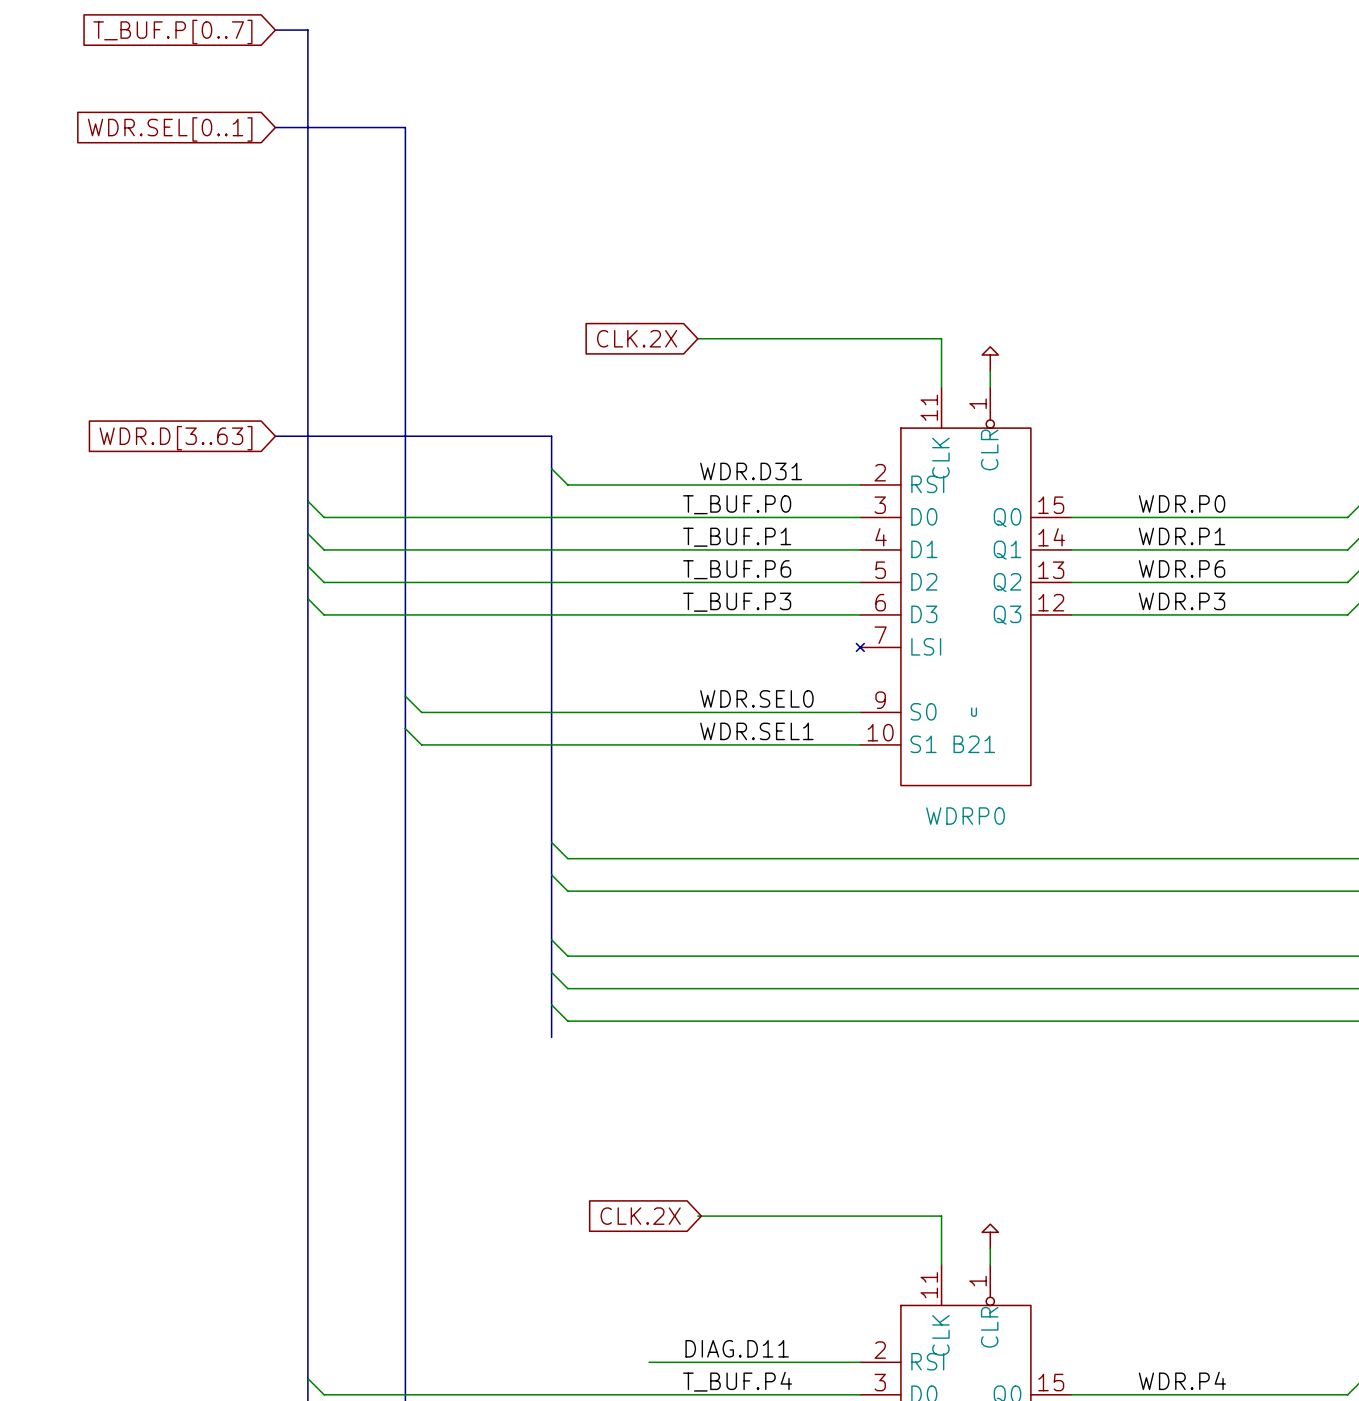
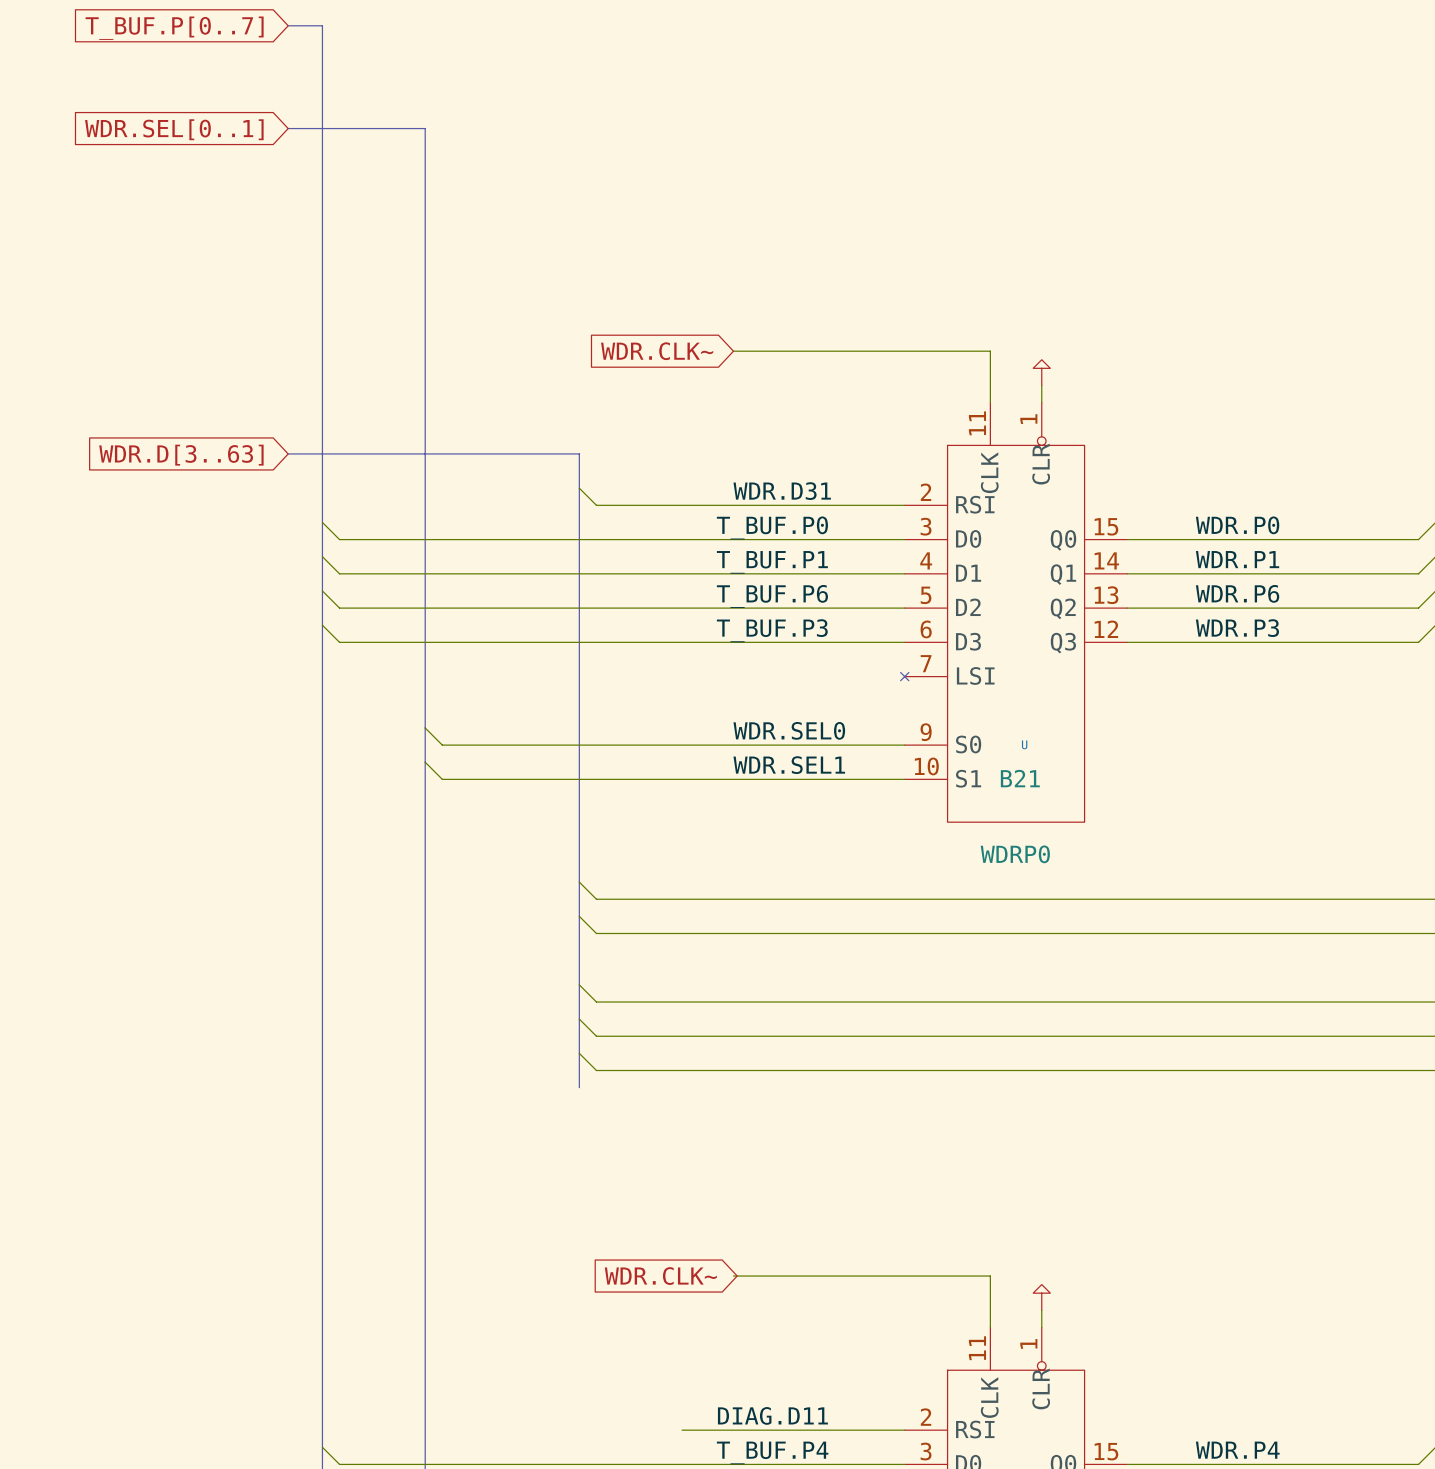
global label: CLK.2X (637, 338) -> WDR.CLK~ (657, 351)
global label: CLK.2X (640, 1216) -> WDR.CLK~ (660, 1276)

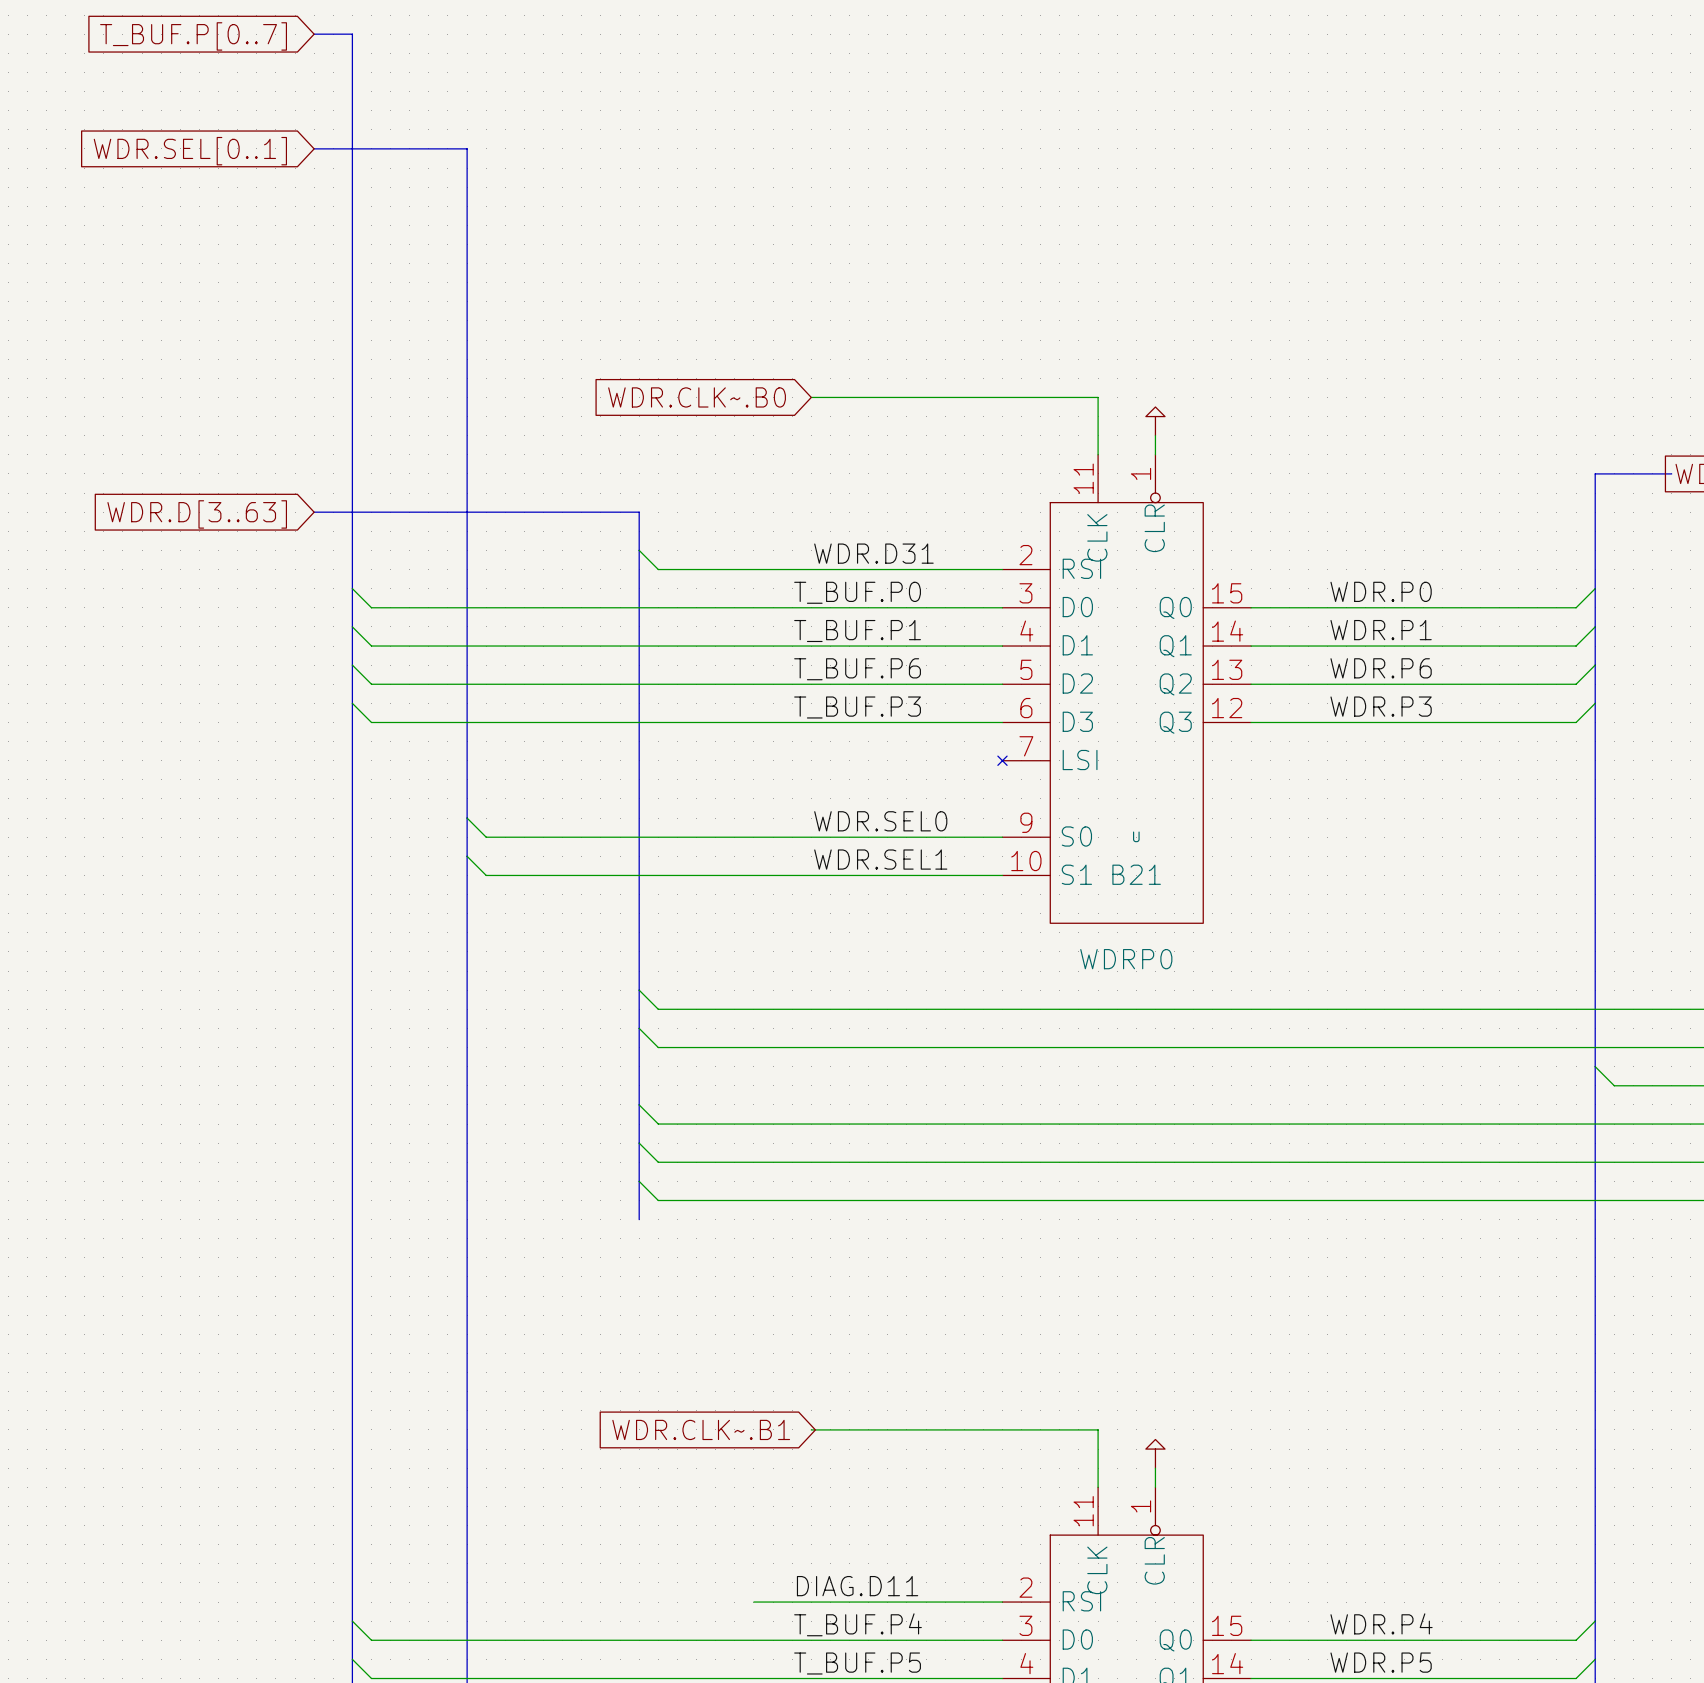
global label: WDR.CLK~ (657, 351) -> WDR.CLK~.B0 (697, 397)
global label: WDR.CLK~ (660, 1276) -> WDR.CLK~.B1 (701, 1429)

